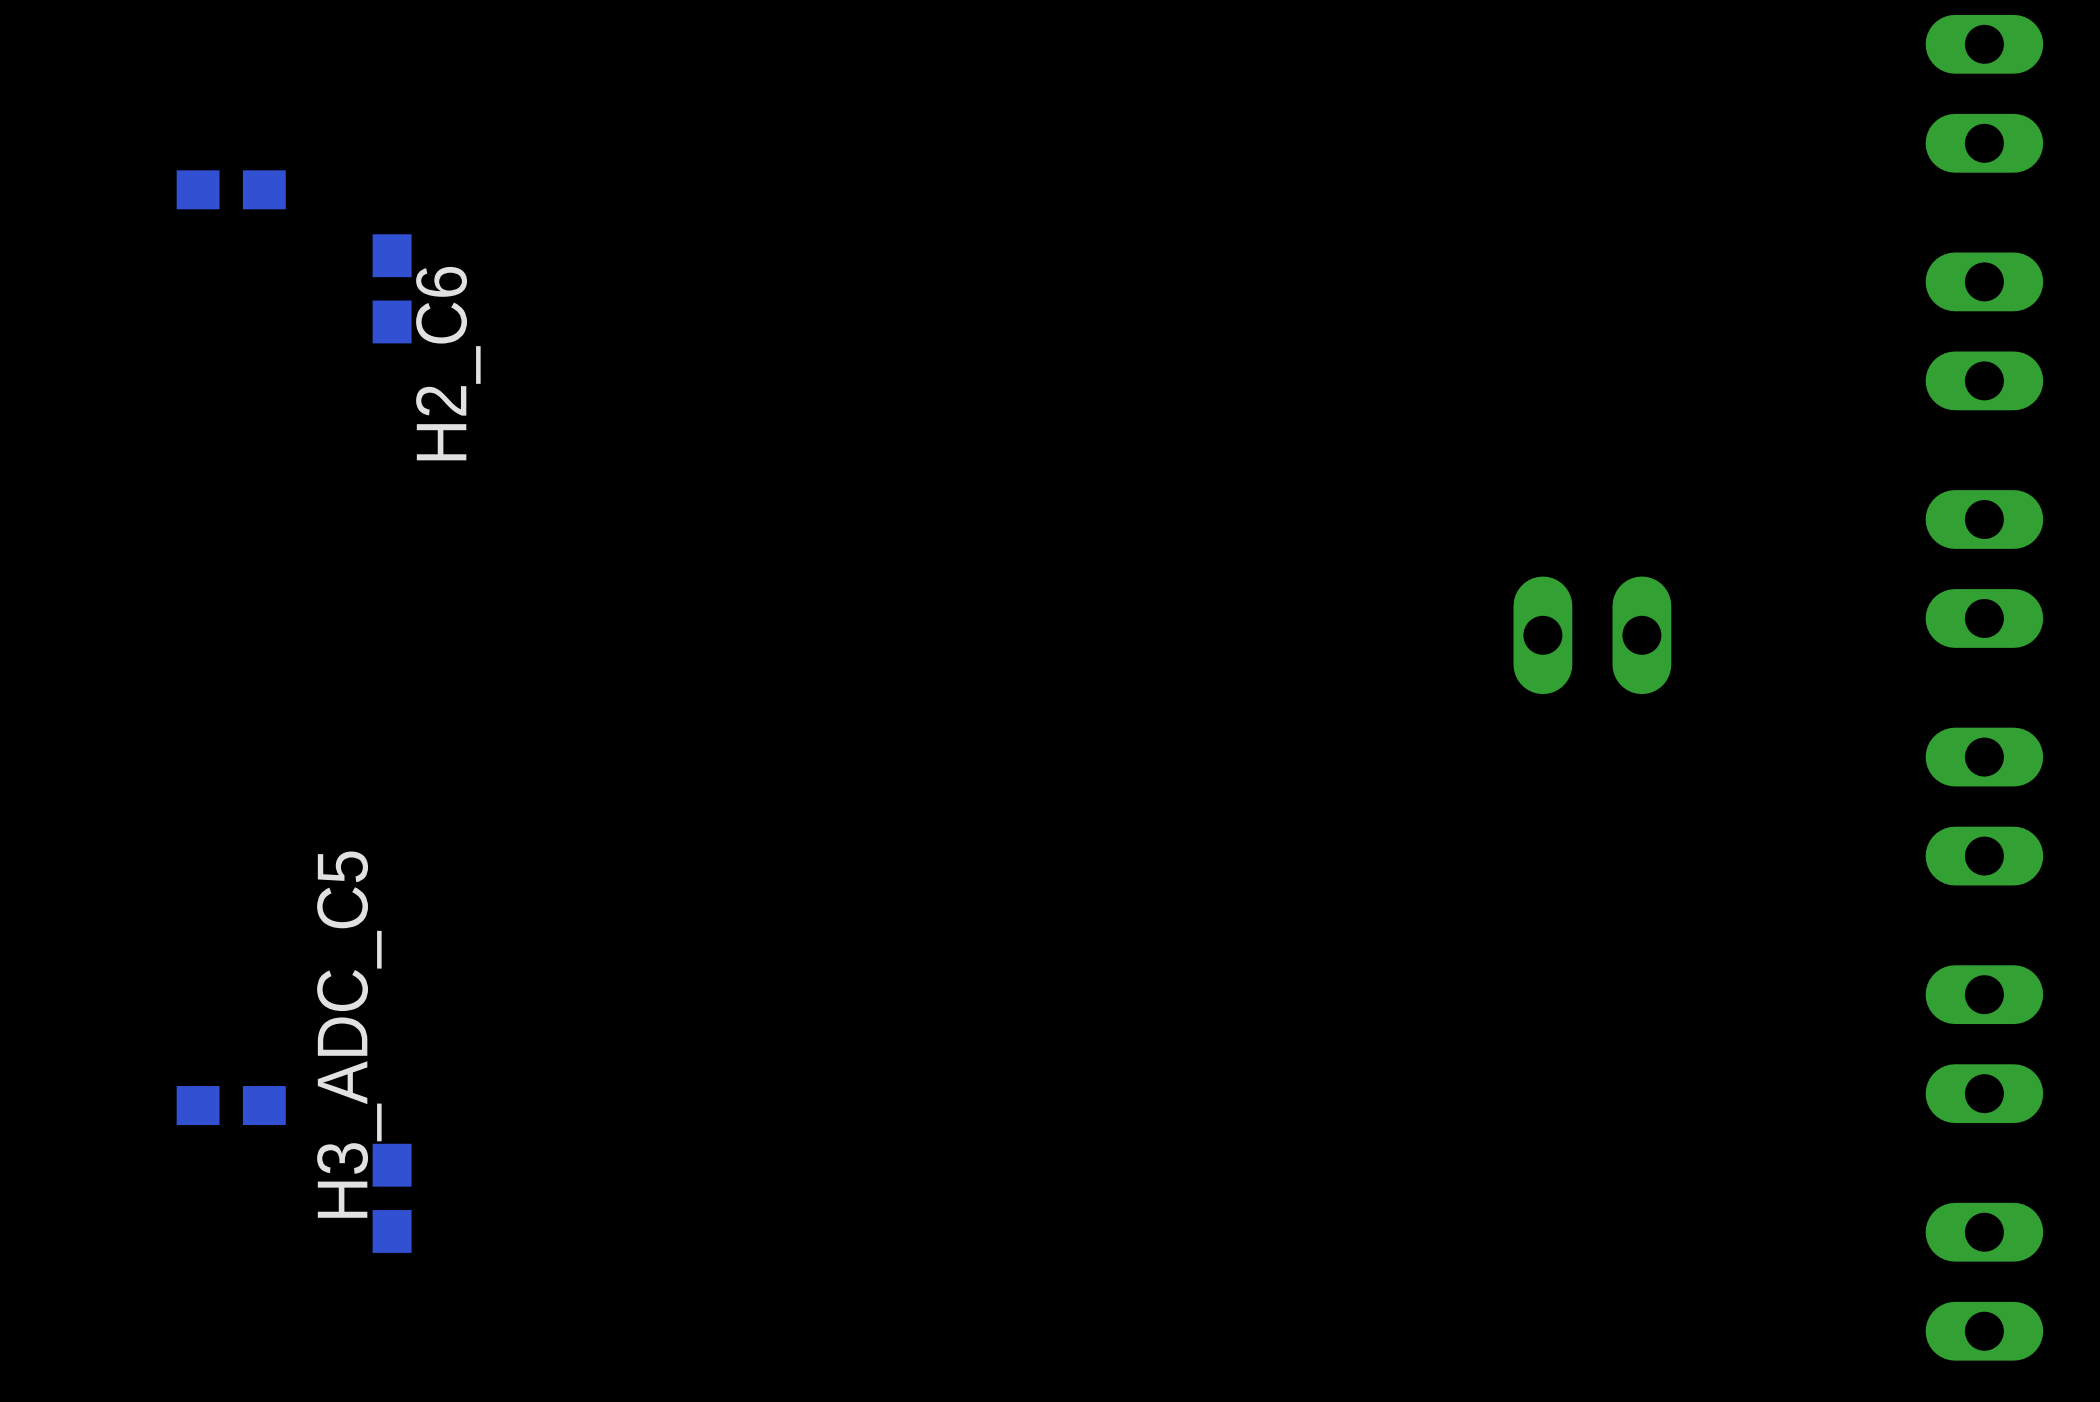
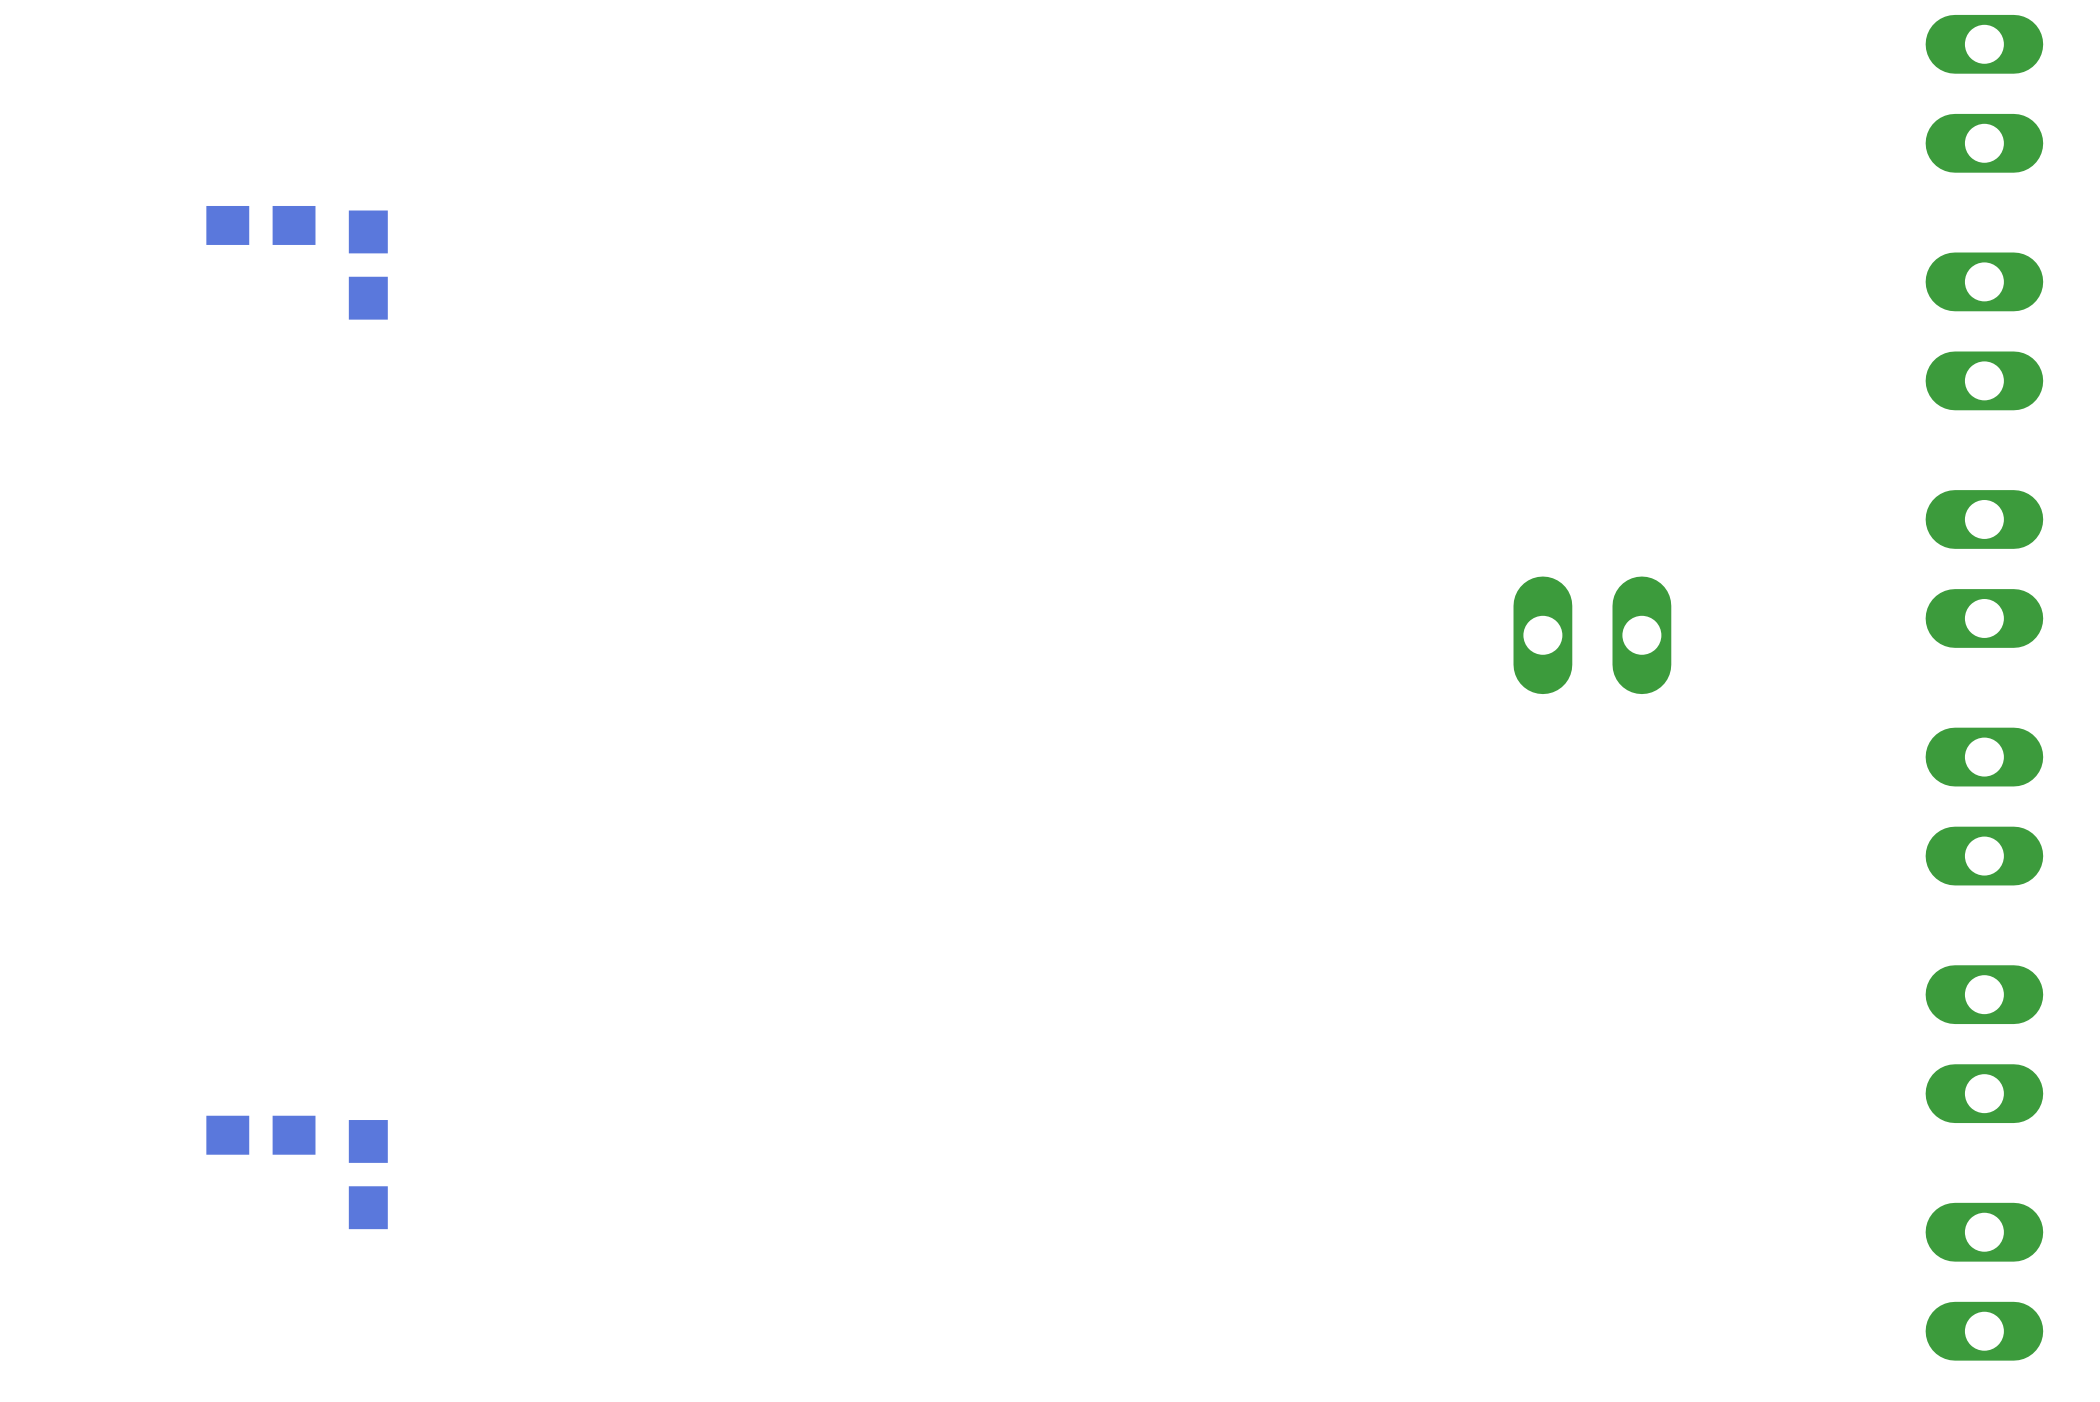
part position: (231, 189) -> (260, 225)
H2_C6 position: (392, 288) -> (368, 265)
H2_C6 name: H2_C6 (448, 363) -> none
H3_ADC_C5 name: H3_ADC_C5 (349, 1034) -> none
part position: (231, 1105) -> (260, 1135)
H3_ADC_C5 position: (392, 1198) -> (368, 1174)

